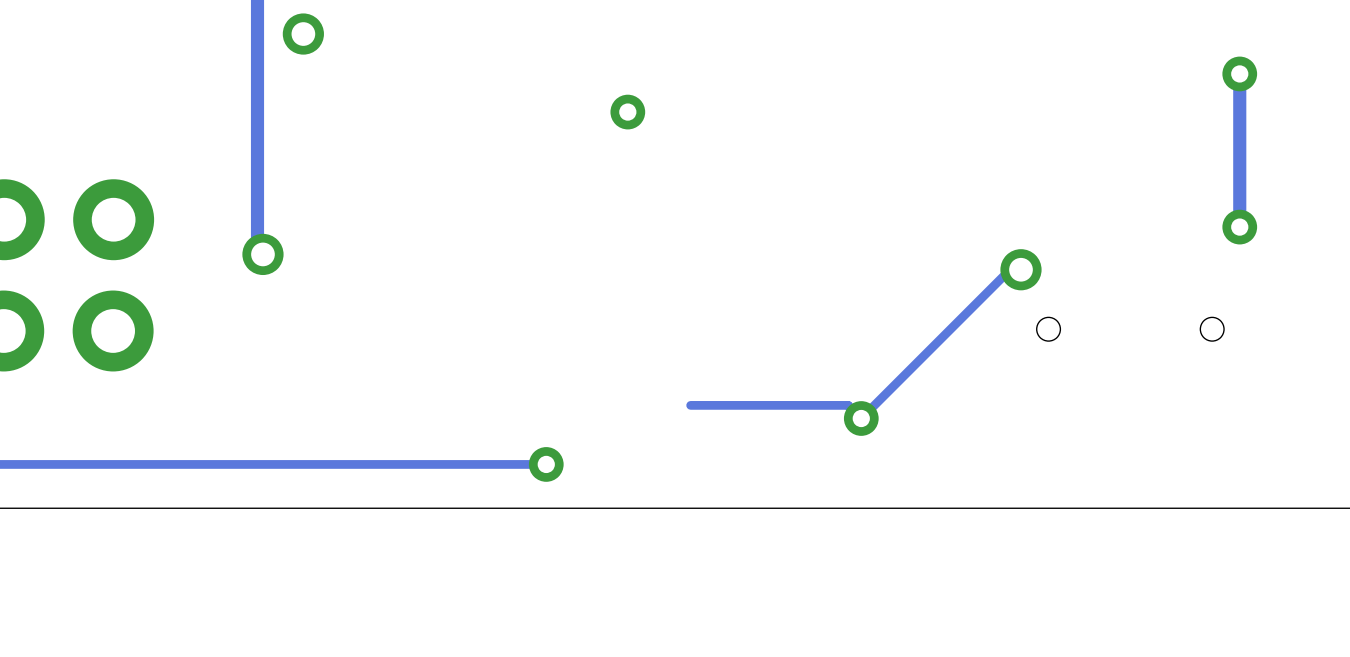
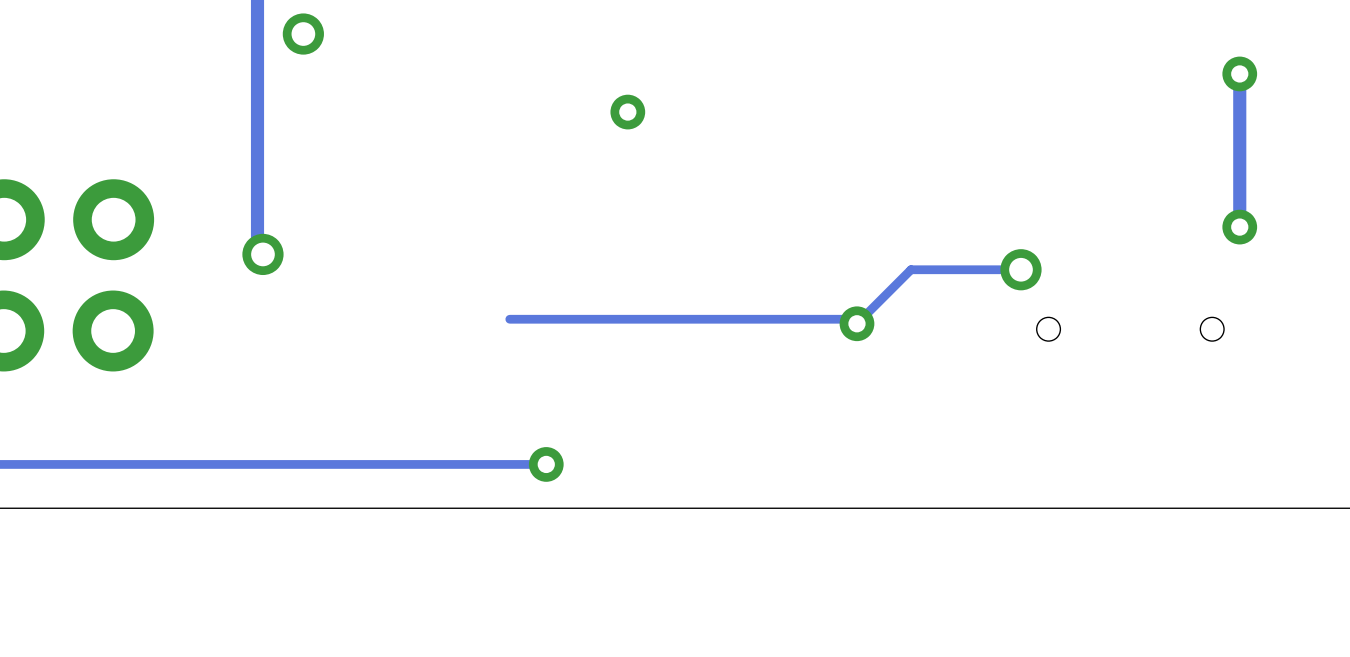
track: (1010, 269) (861, 418) (848, 405) (690, 405) -> (1010, 269) (911, 269) (856, 323) (852, 319) (509, 319)
via position: (861, 418) -> (856, 323)

